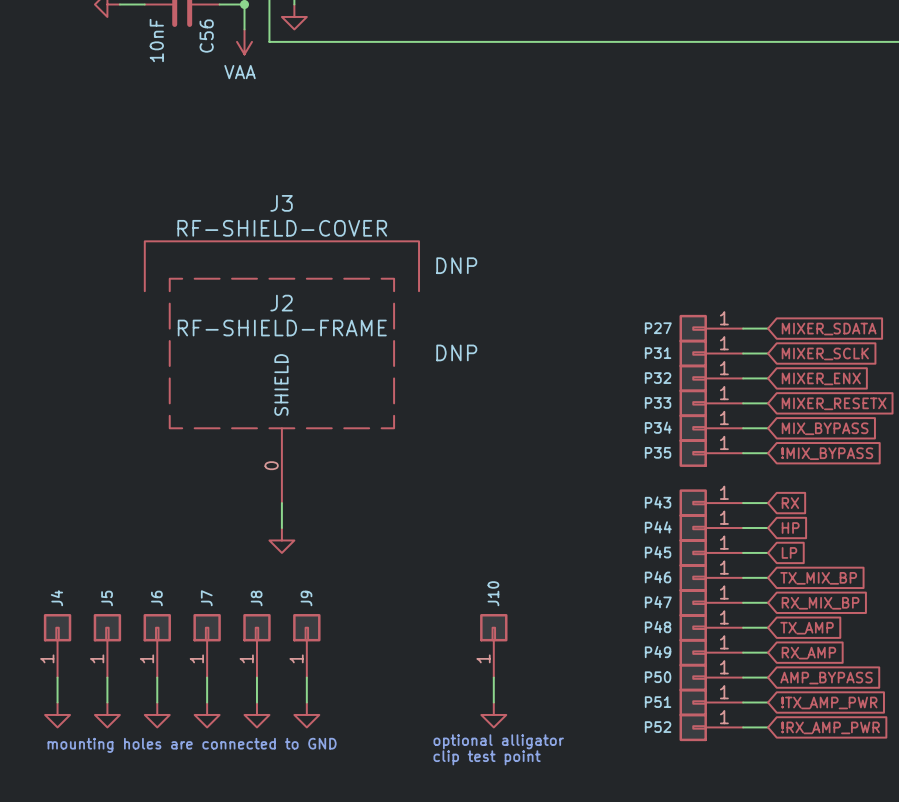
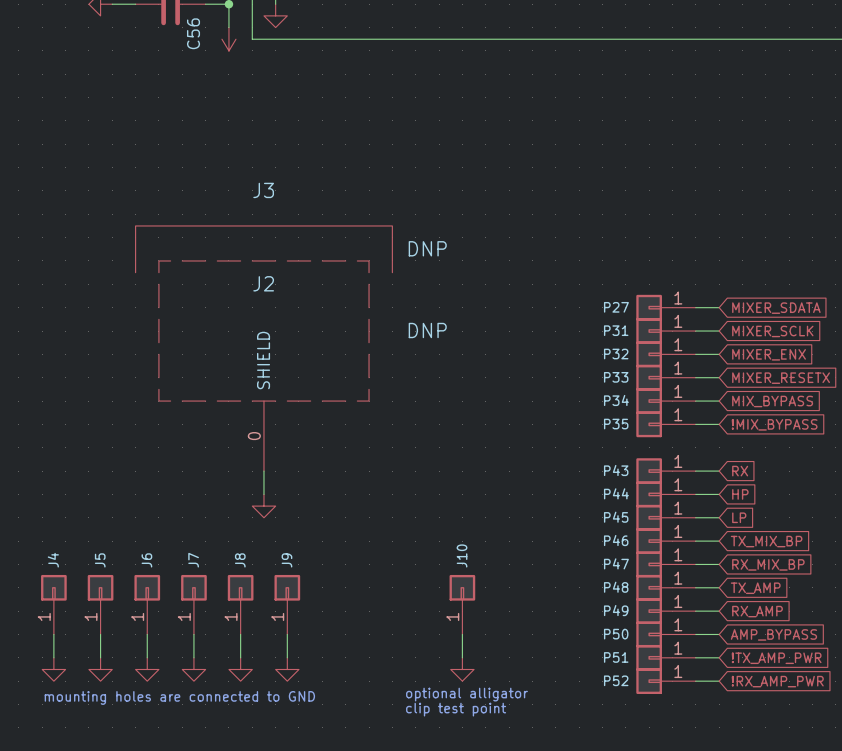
C56 value: 10nF (156, 40) -> none
power symbol text: VAA (240, 72) -> none
J3 value: RF-SHIELD-COVER (282, 228) -> none
J2 value: RF-SHIELD-FRAME (282, 328) -> none

